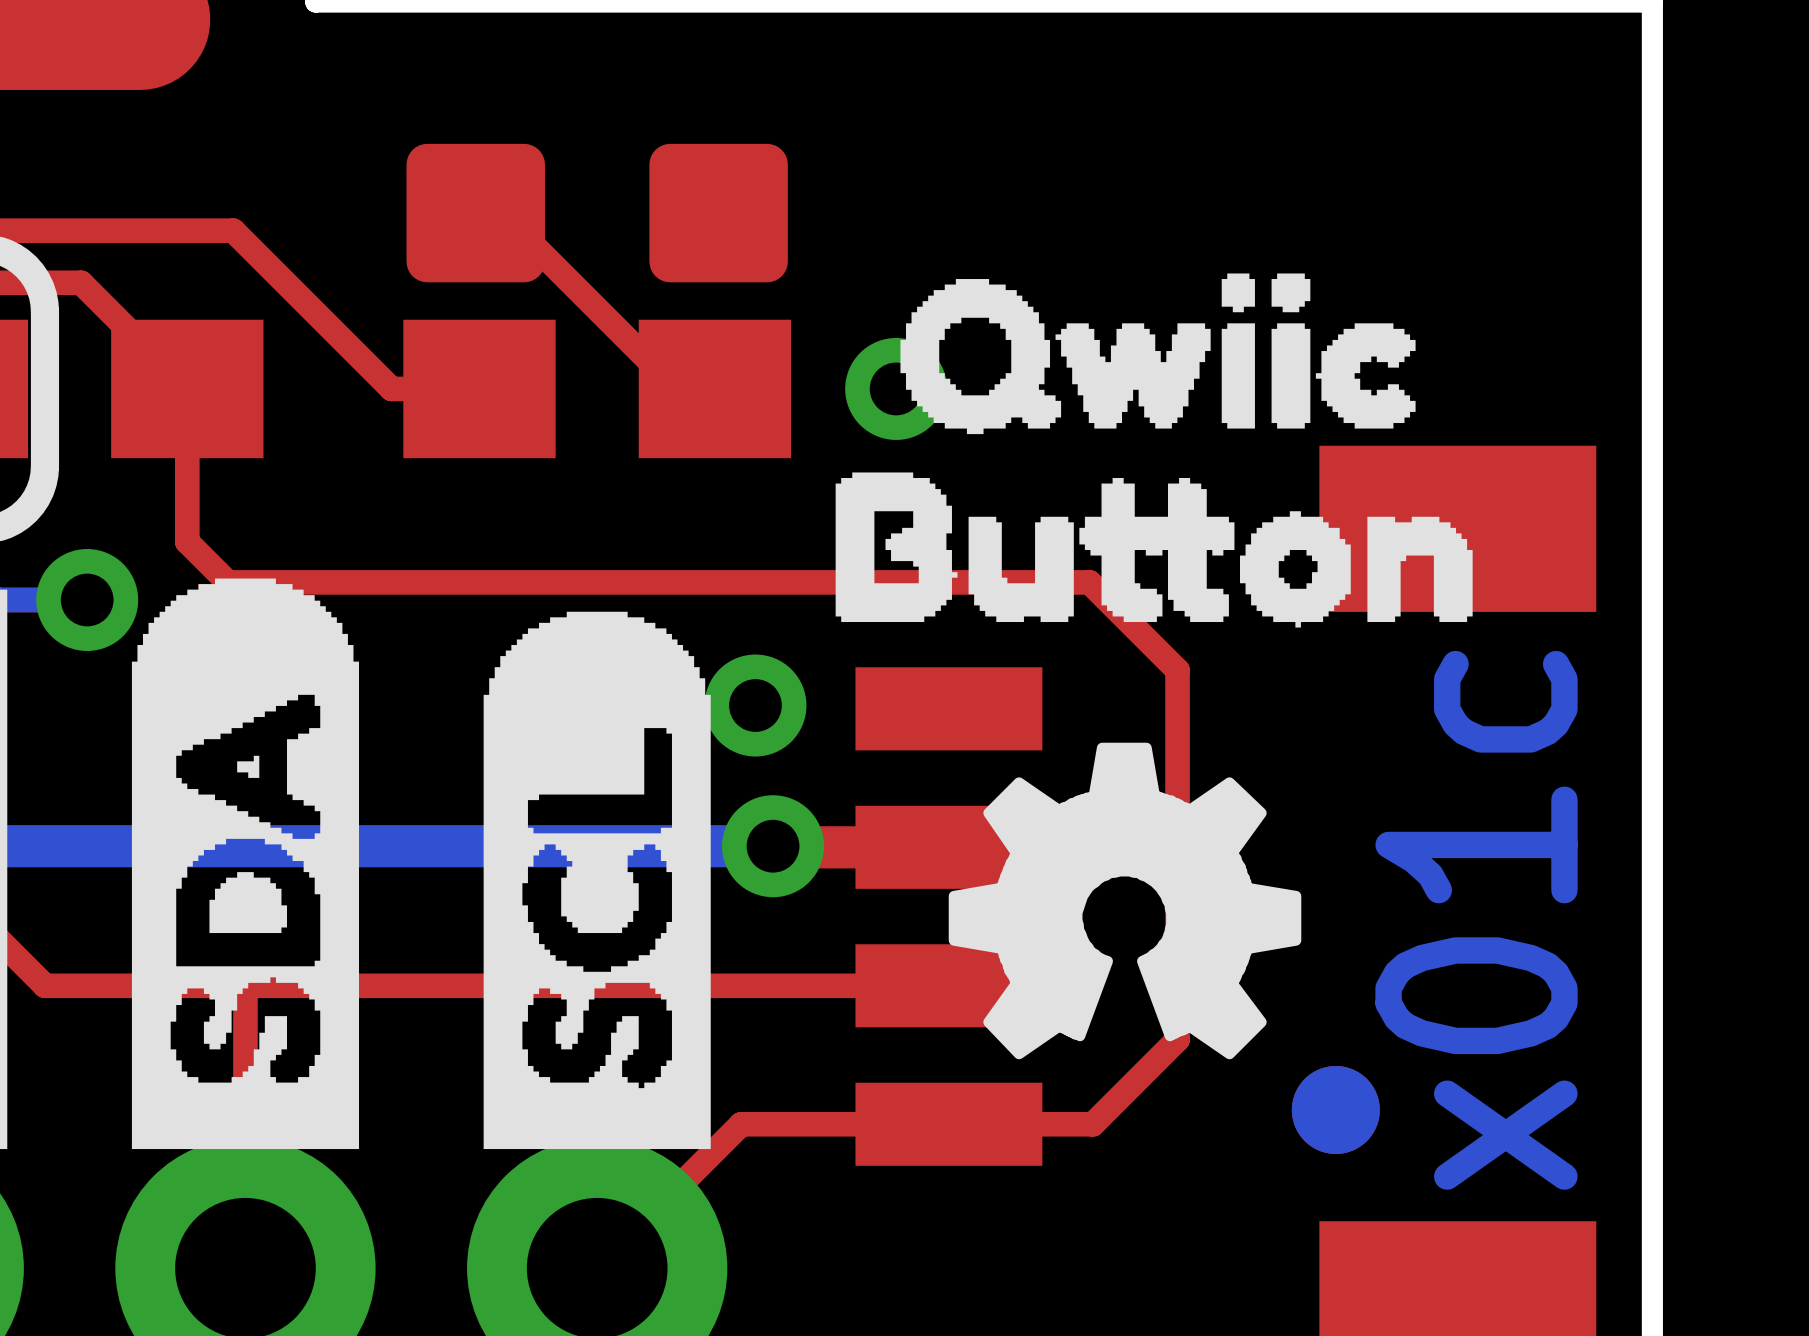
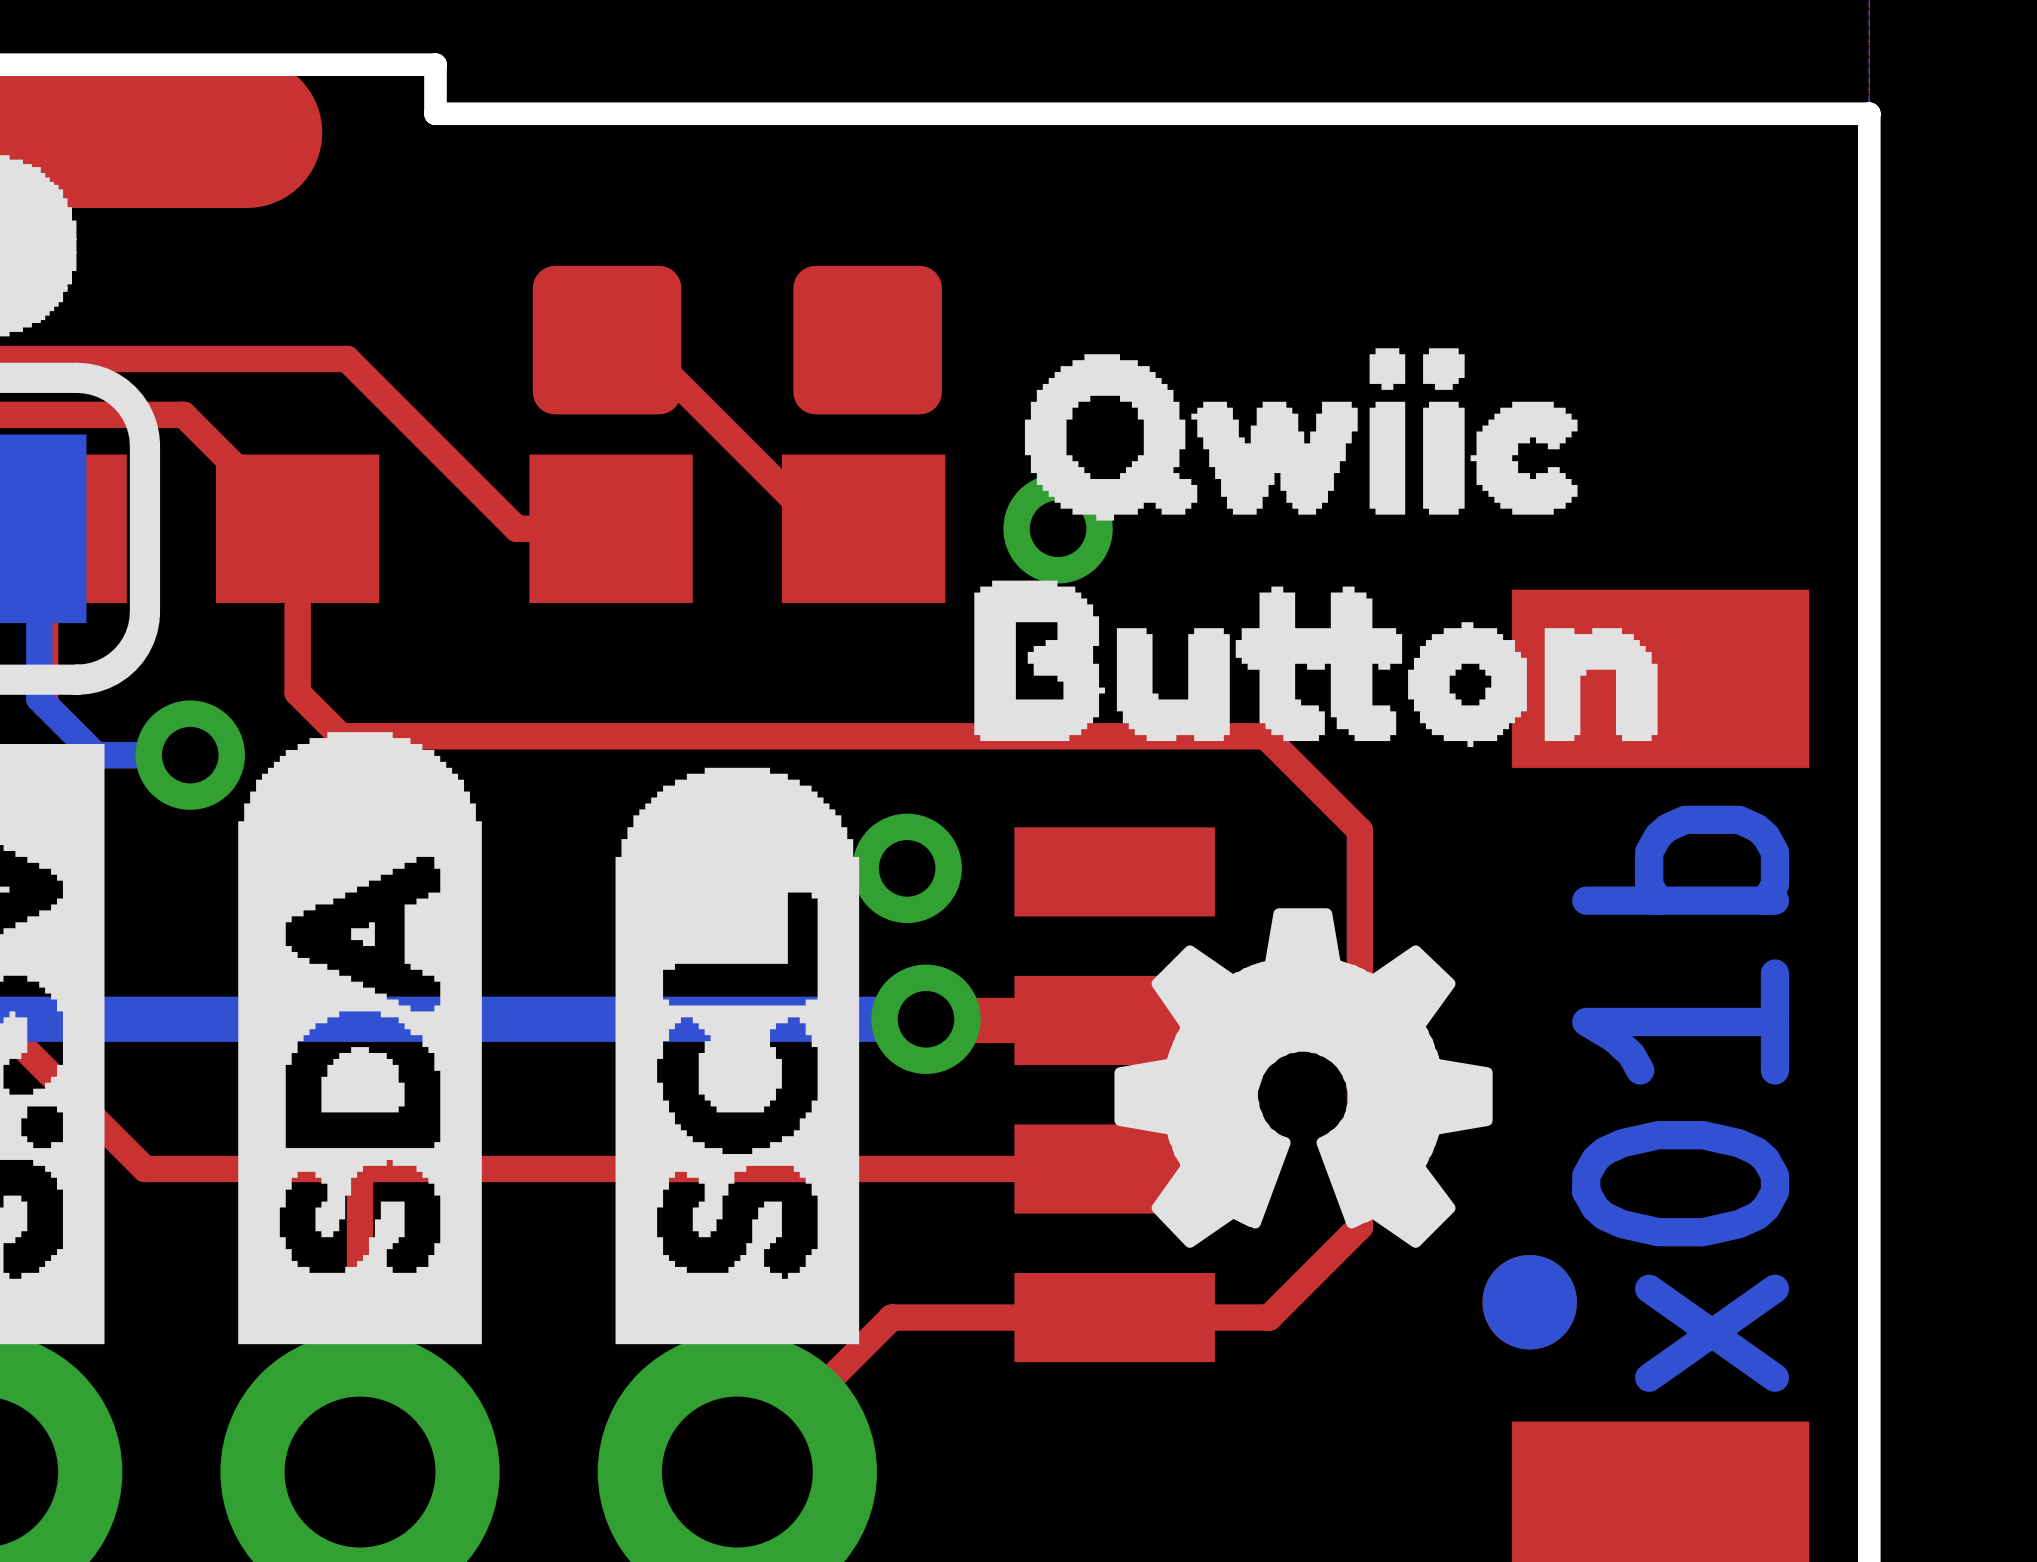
drawing position: (1158, 353) -> (1301, 434)
drawing position: (1154, 550) -> (1315, 663)
text: x01c (1476, 920) -> x01b (1680, 1098)

